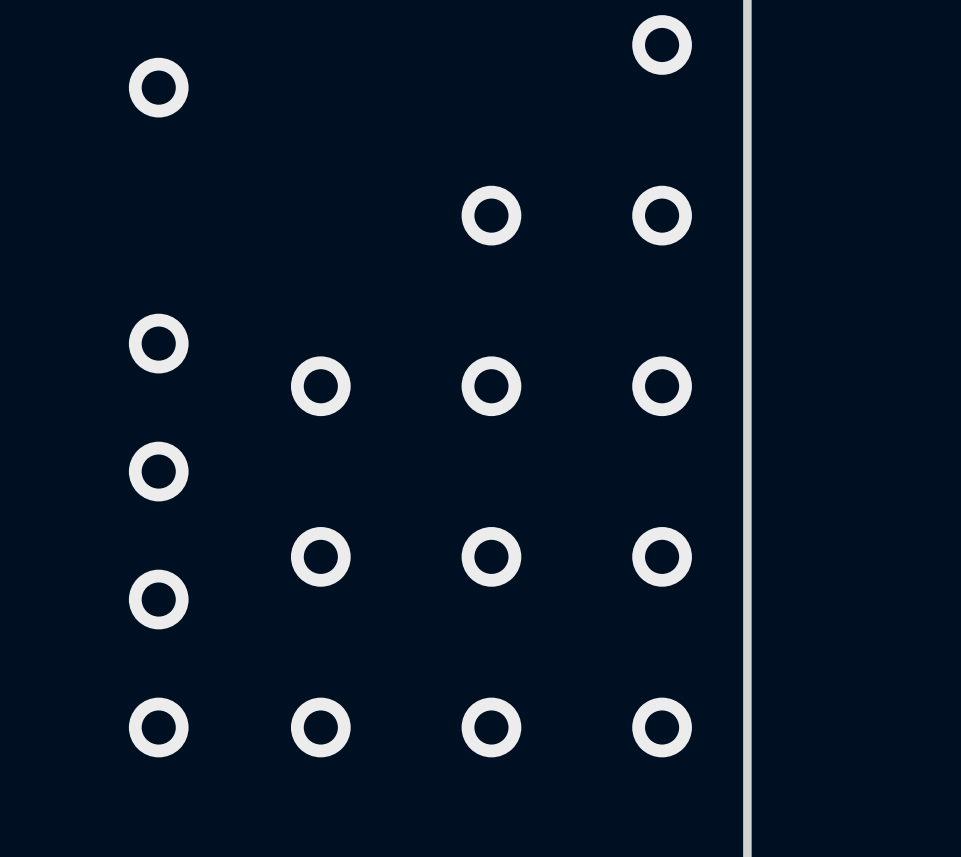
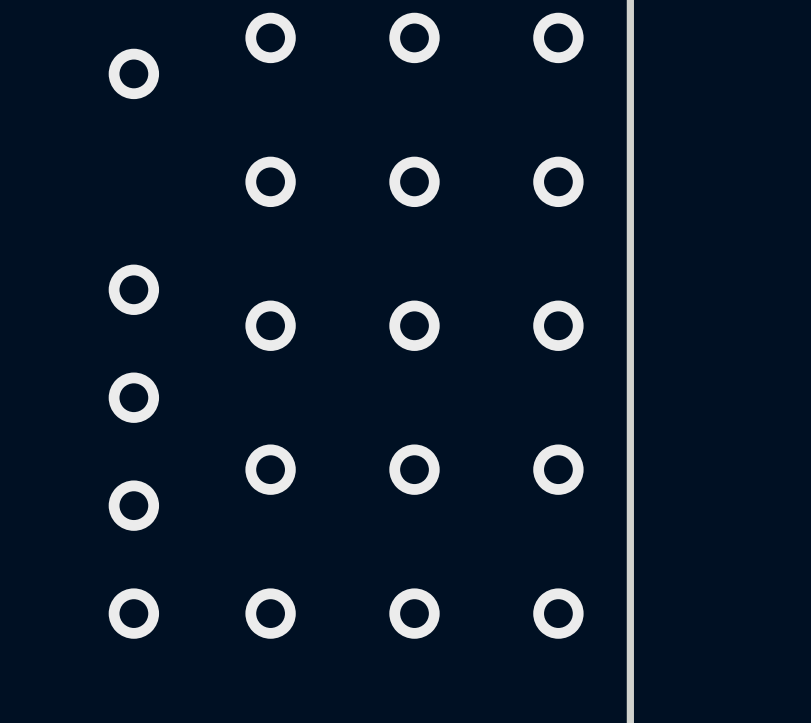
via: none -> (270, 37)
via: none -> (414, 37)
via: none -> (270, 181)

